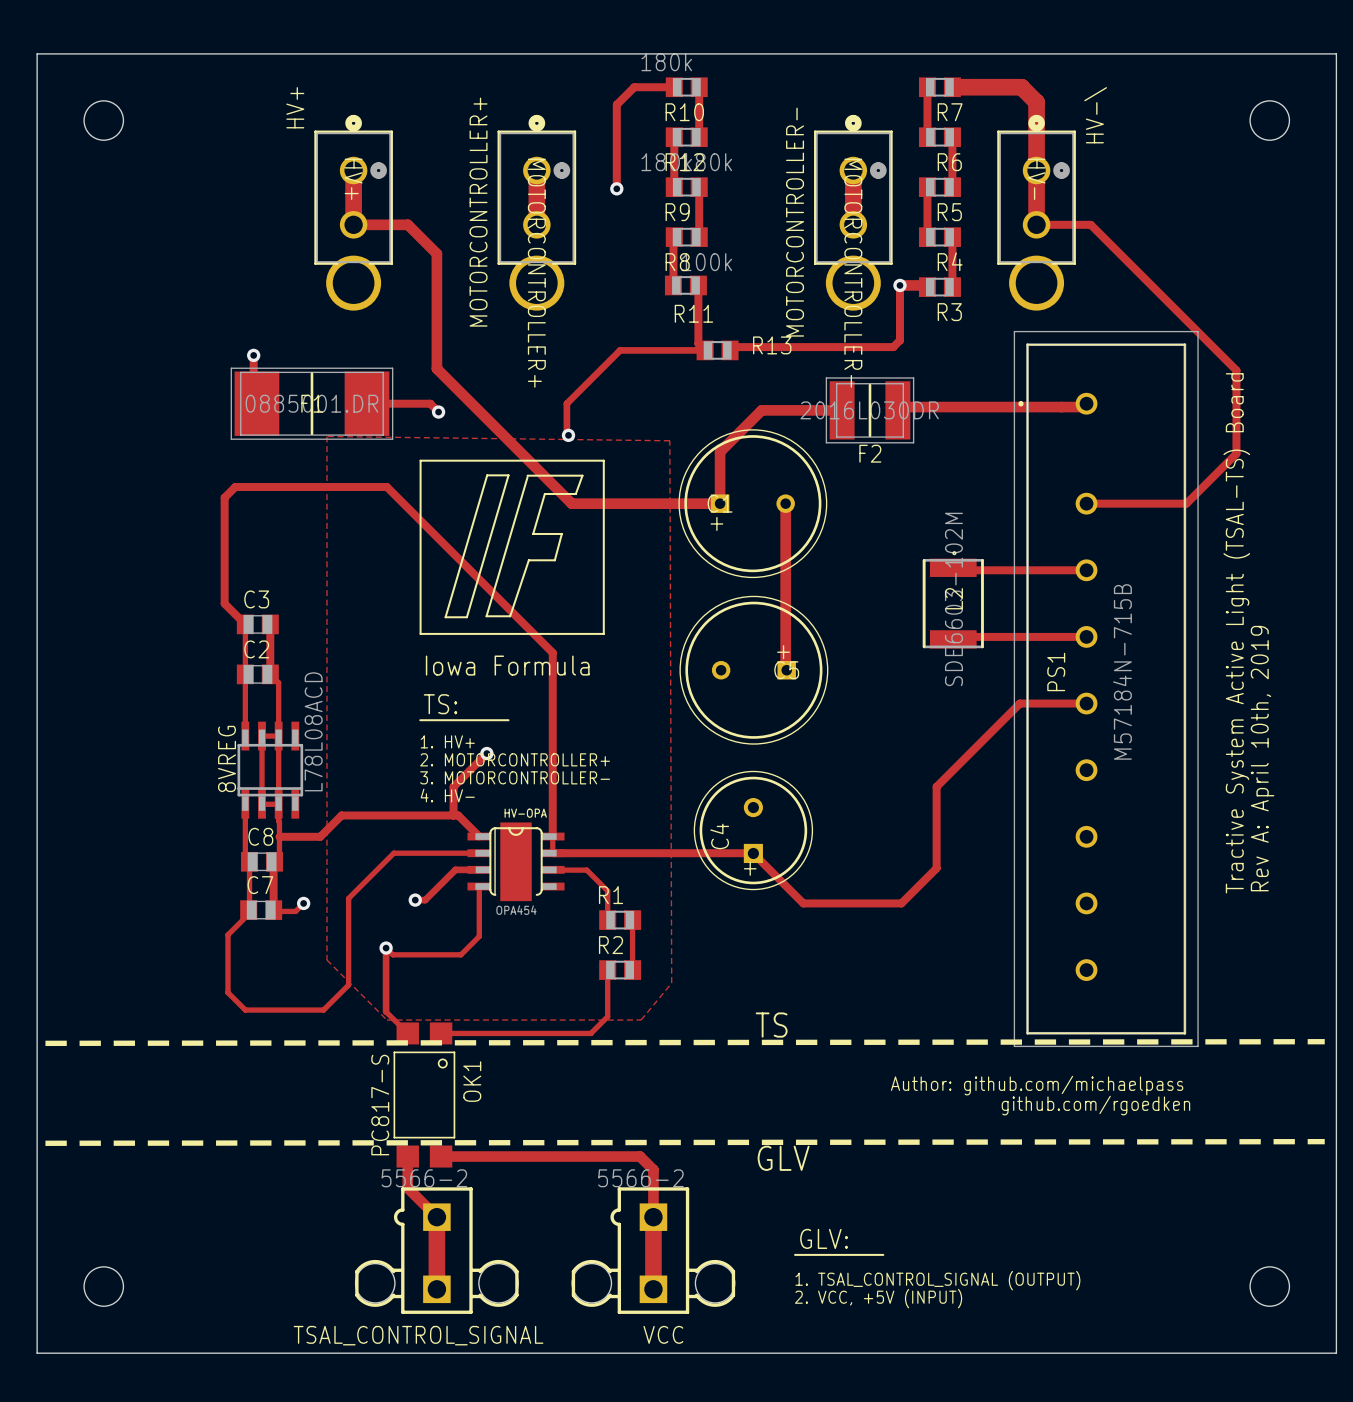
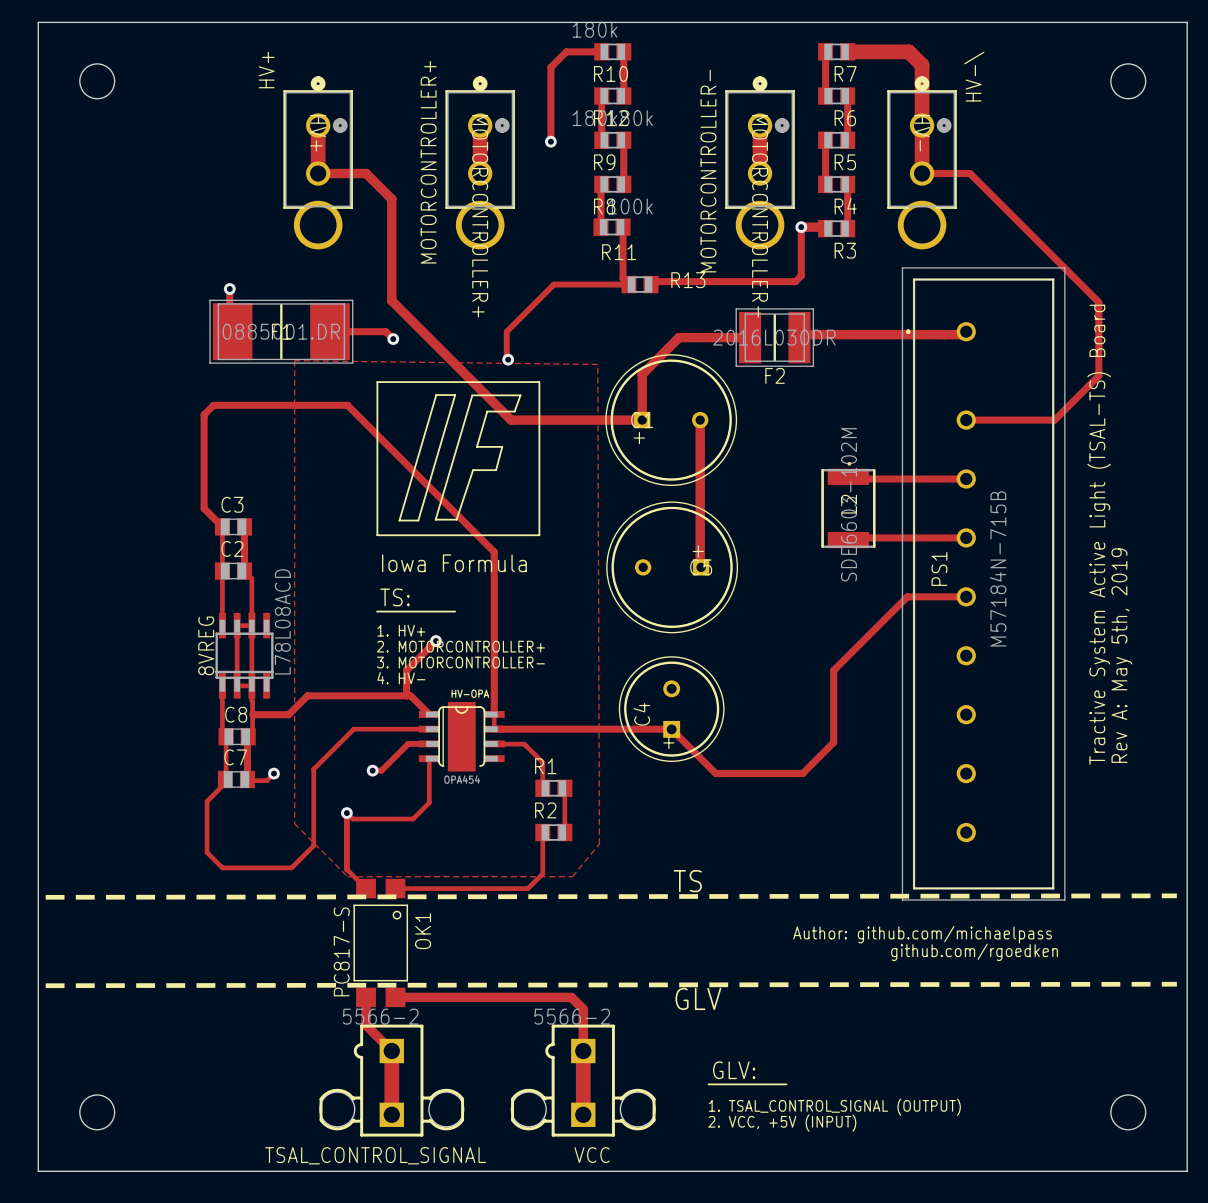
text: Rev A: April 10th, 2019 (1262, 758) -> Rev A: May 5th, 2019 (1121, 655)

